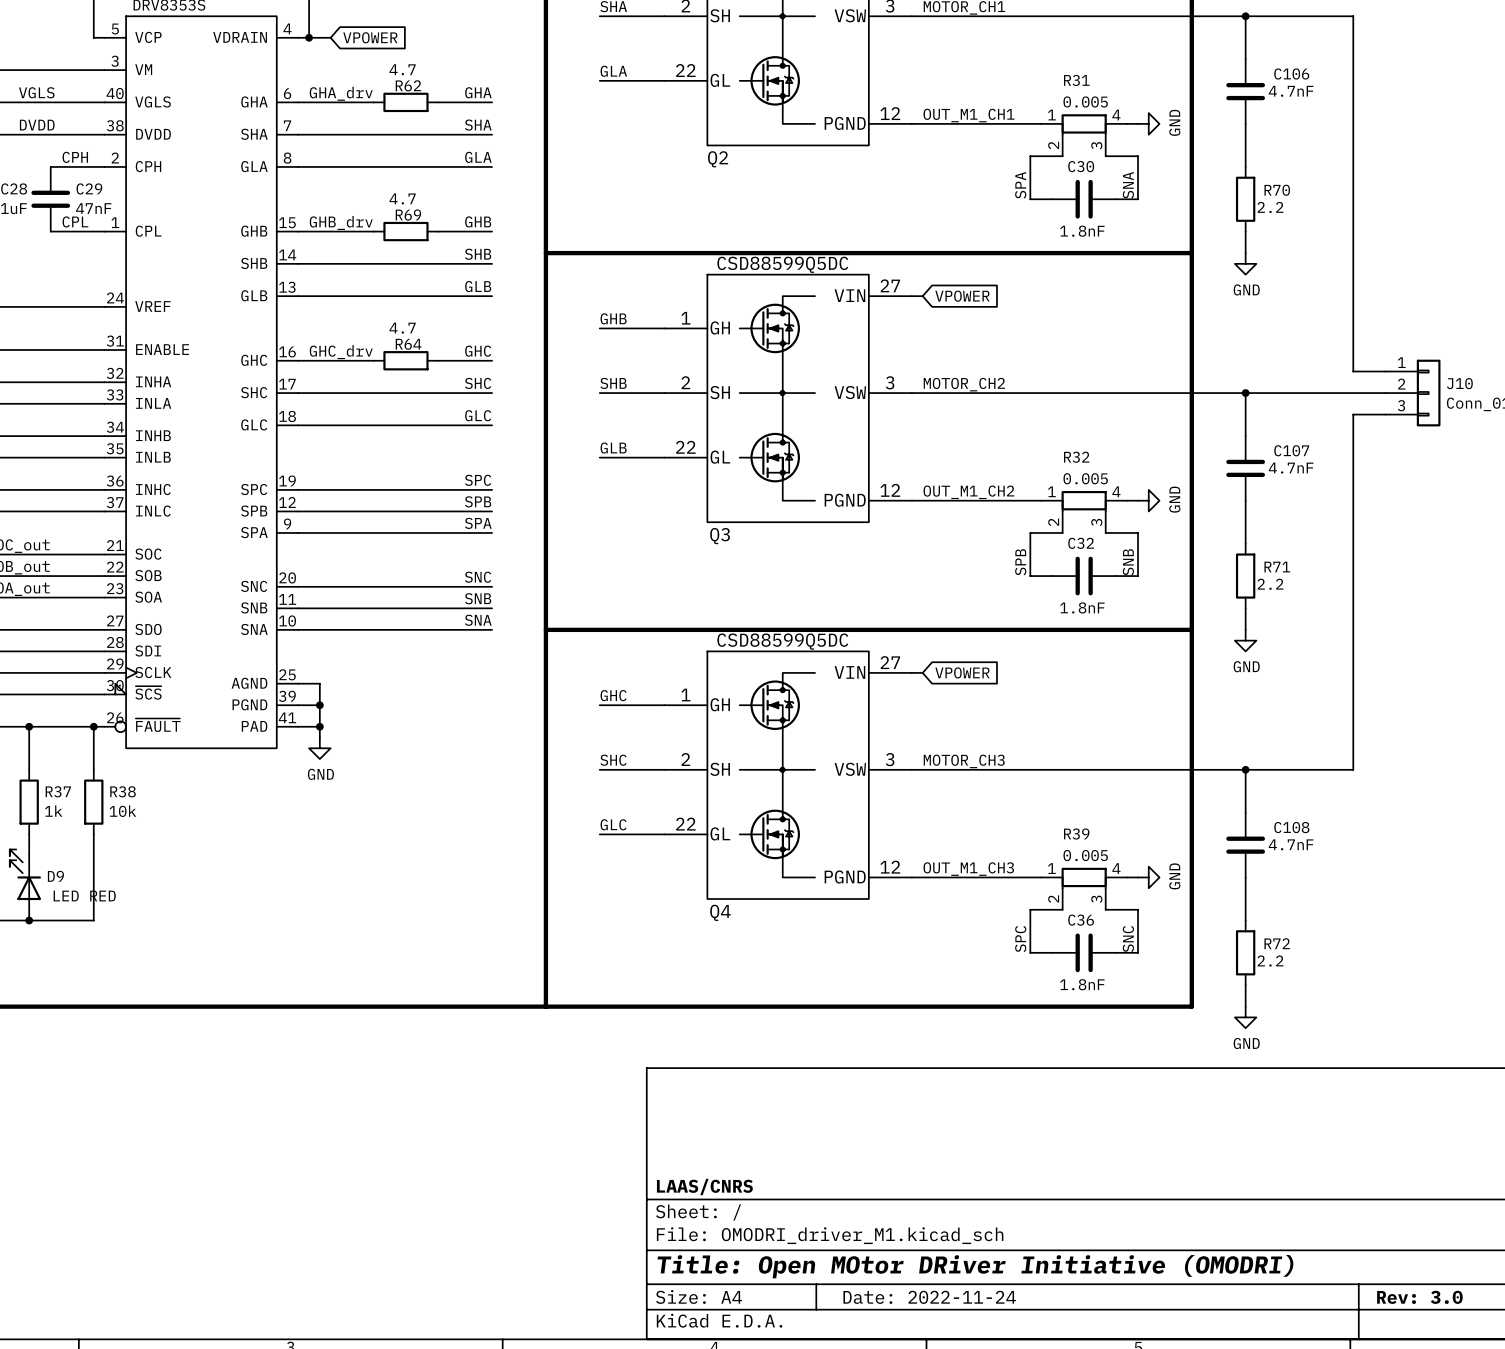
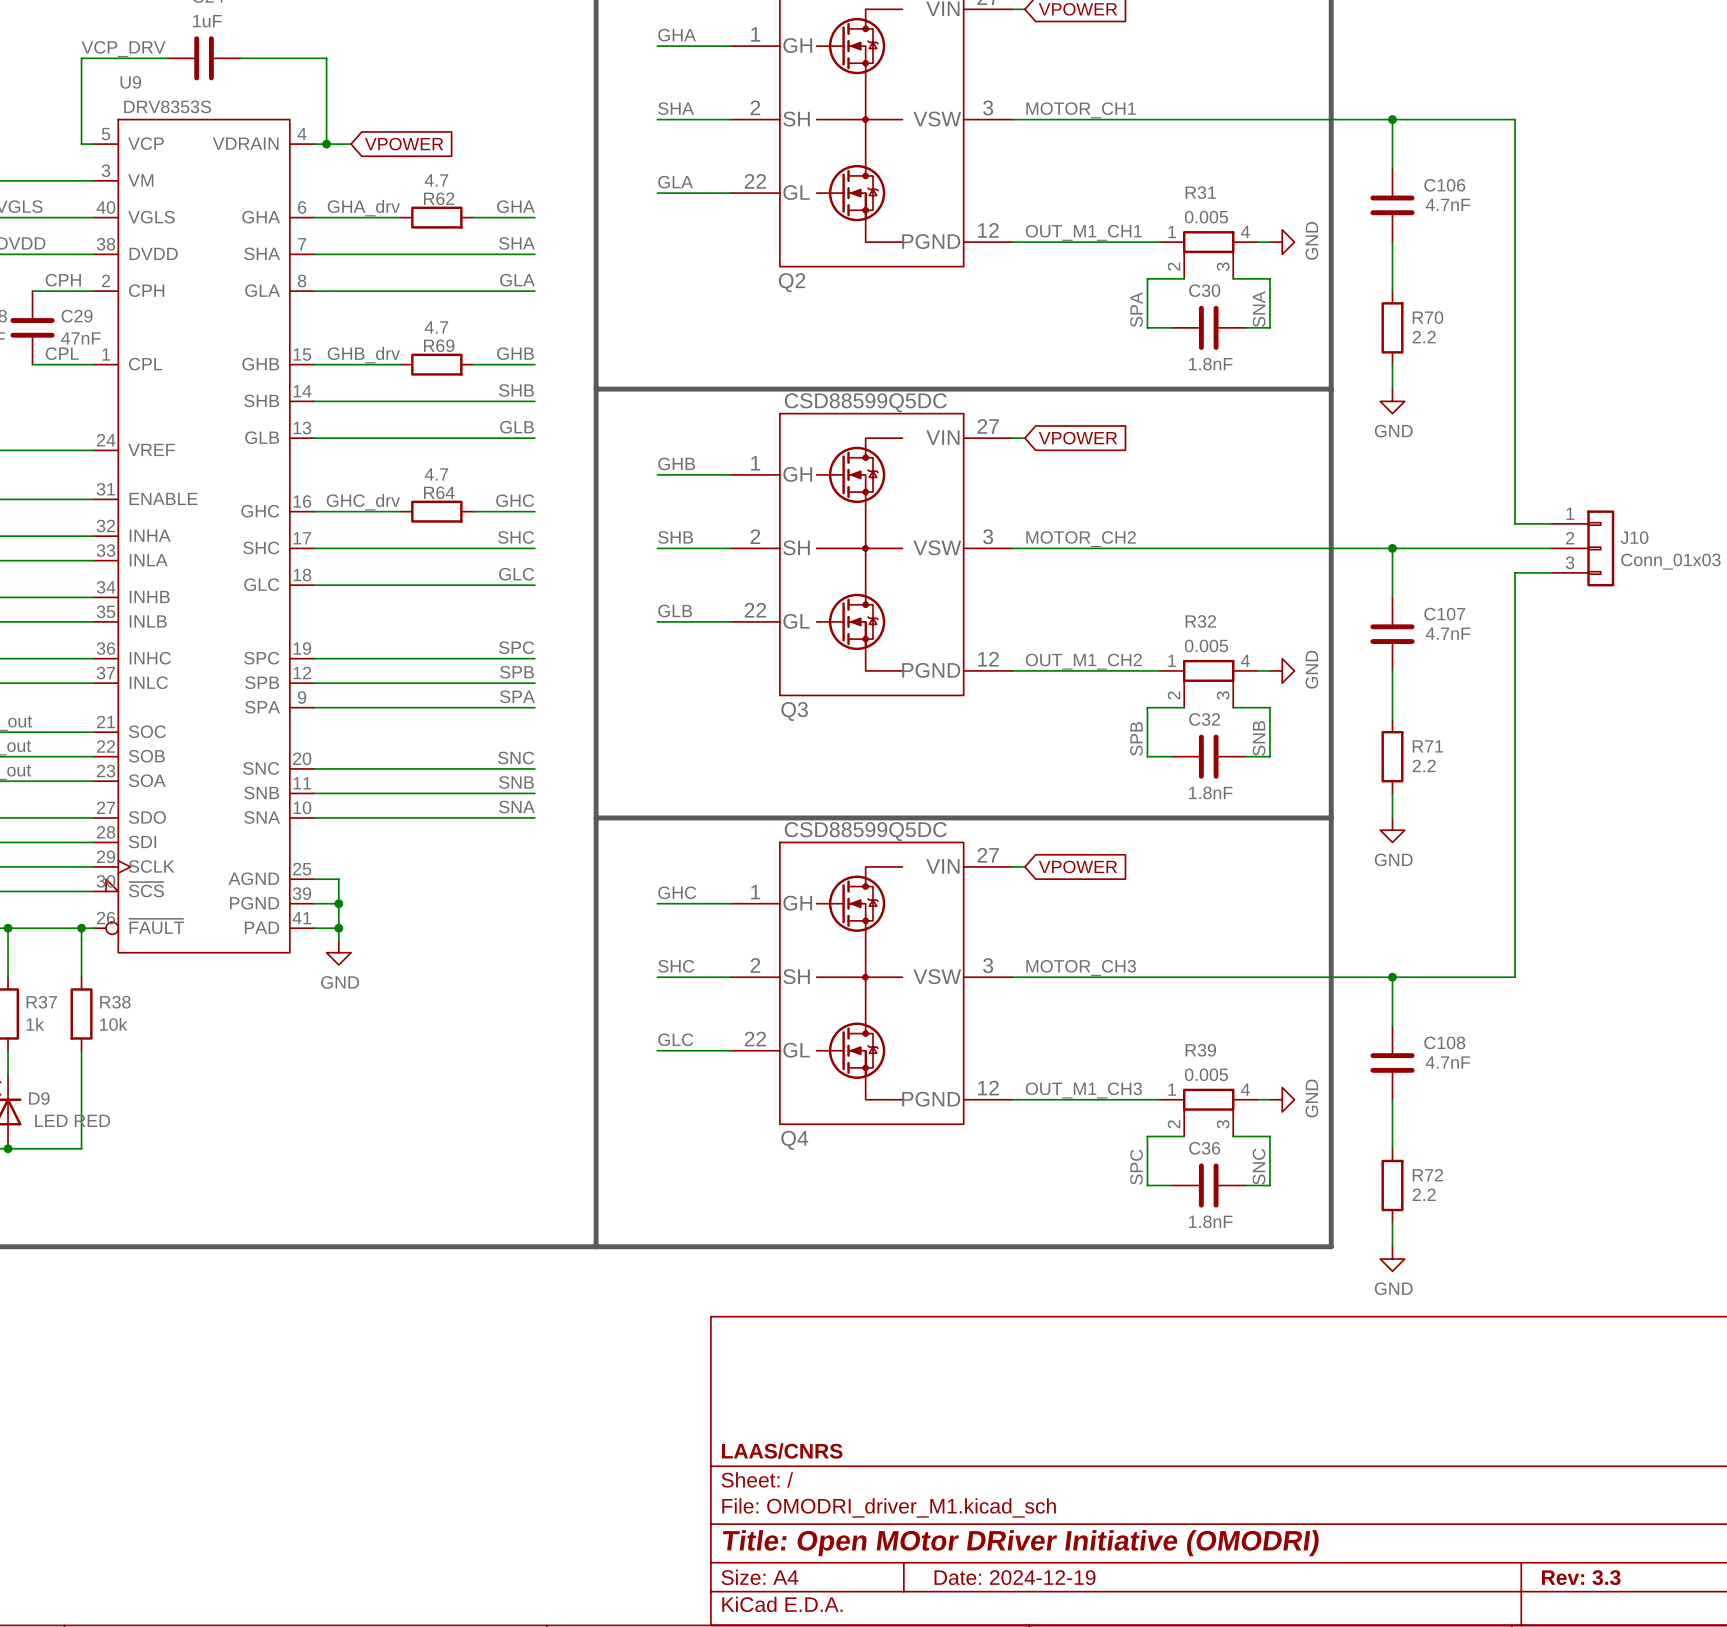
title block: Date: 2022-11-24 (929, 1297) -> Date: 2024-12-19 (1015, 1577)
title block: Rev: 3.0 (1419, 1297) -> Rev: 3.3 (1581, 1577)

